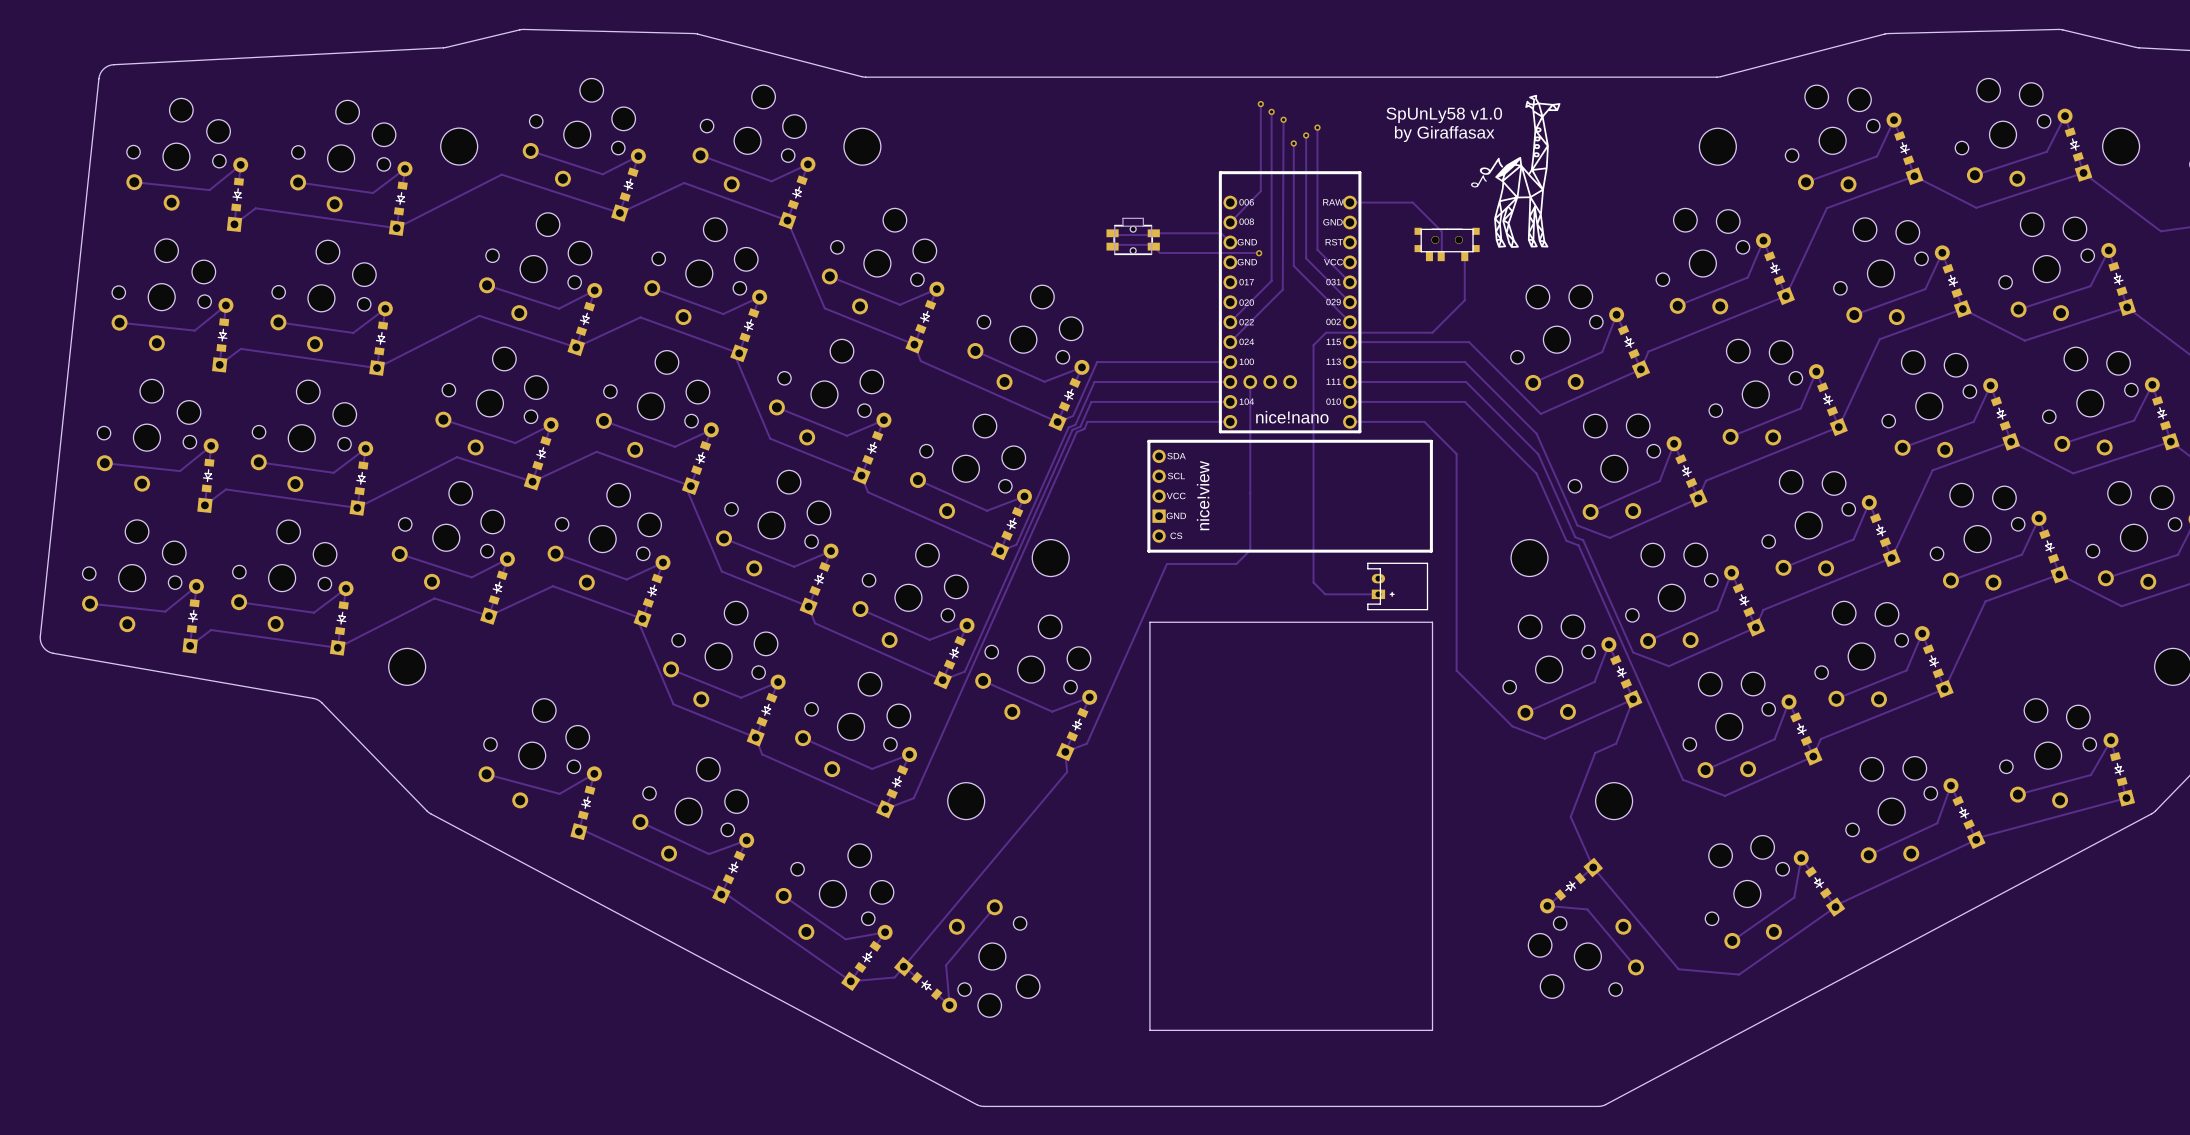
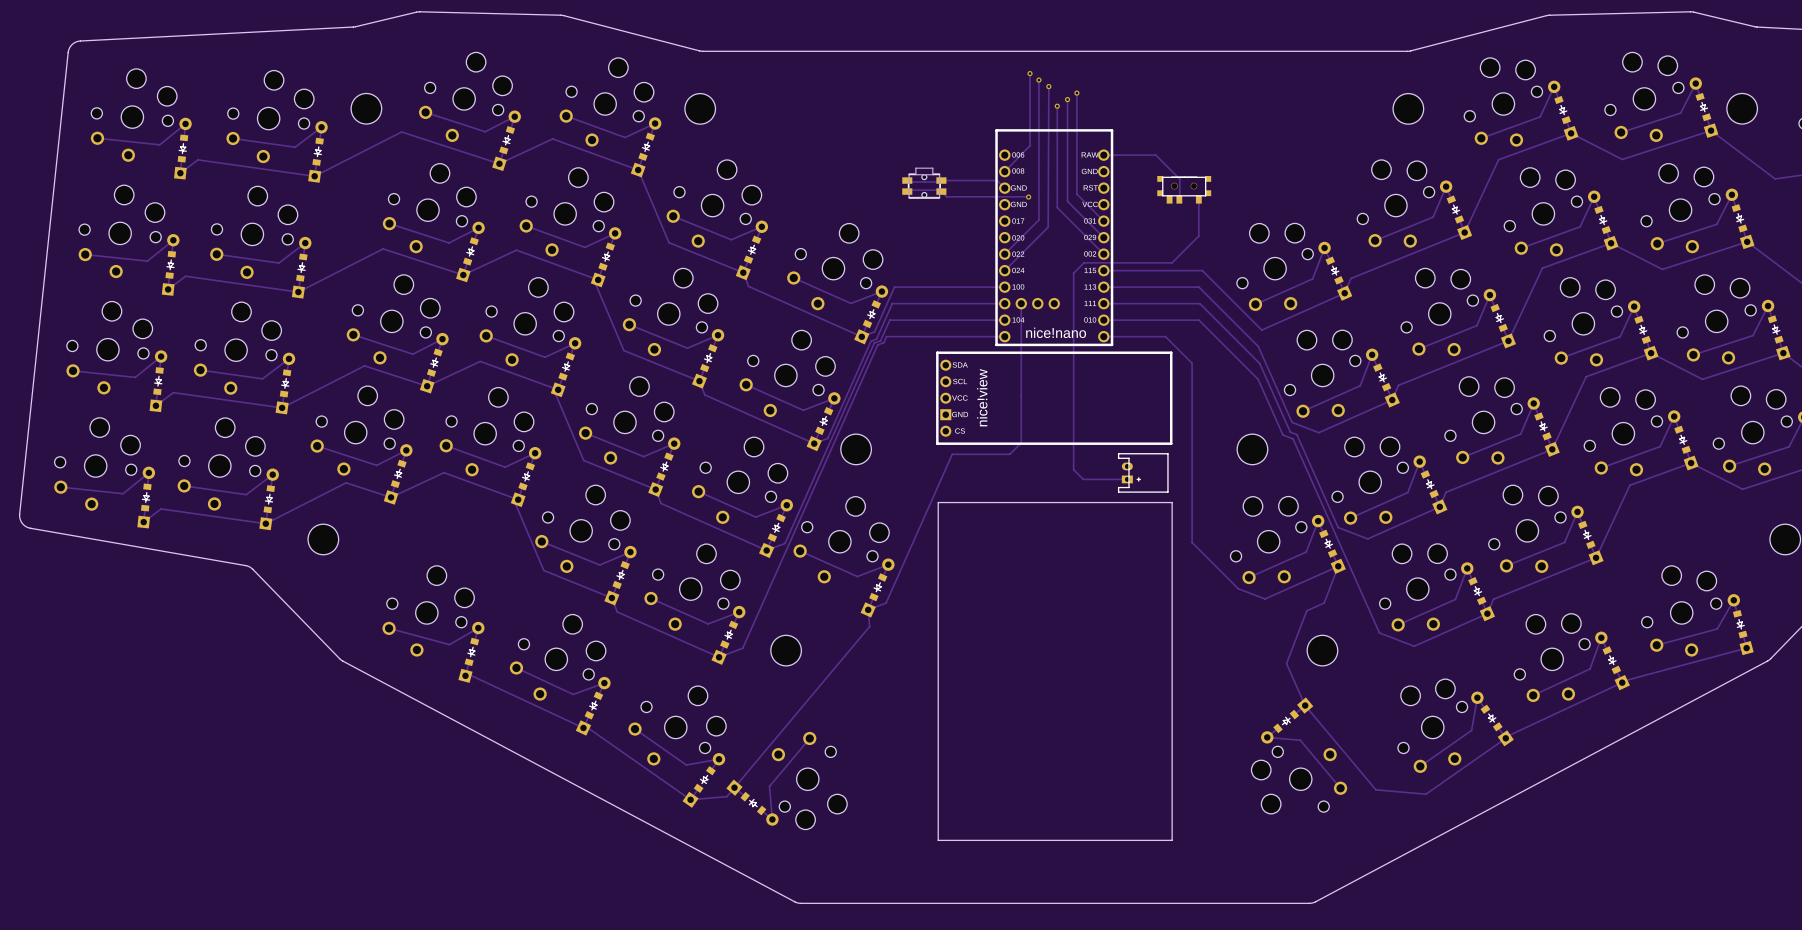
drawing: [1471, 94, 1561, 248] -> none
text: SpUnLy58 v1.0 (1444, 115) -> none
text: by Giraffasax (1444, 134) -> none

